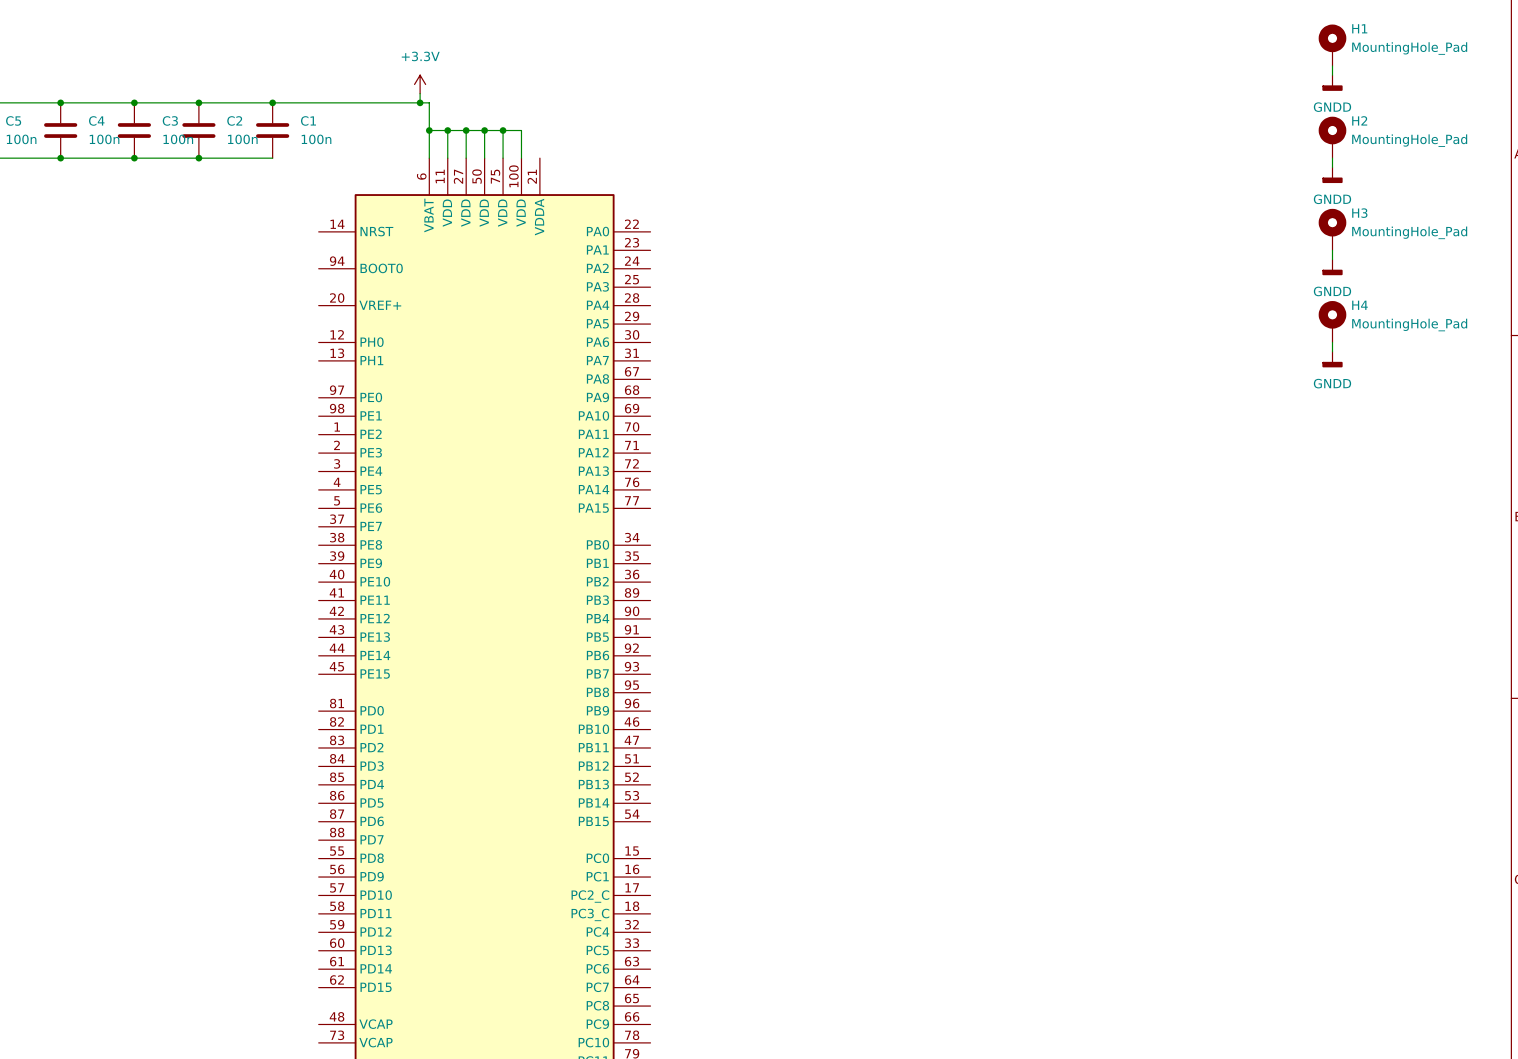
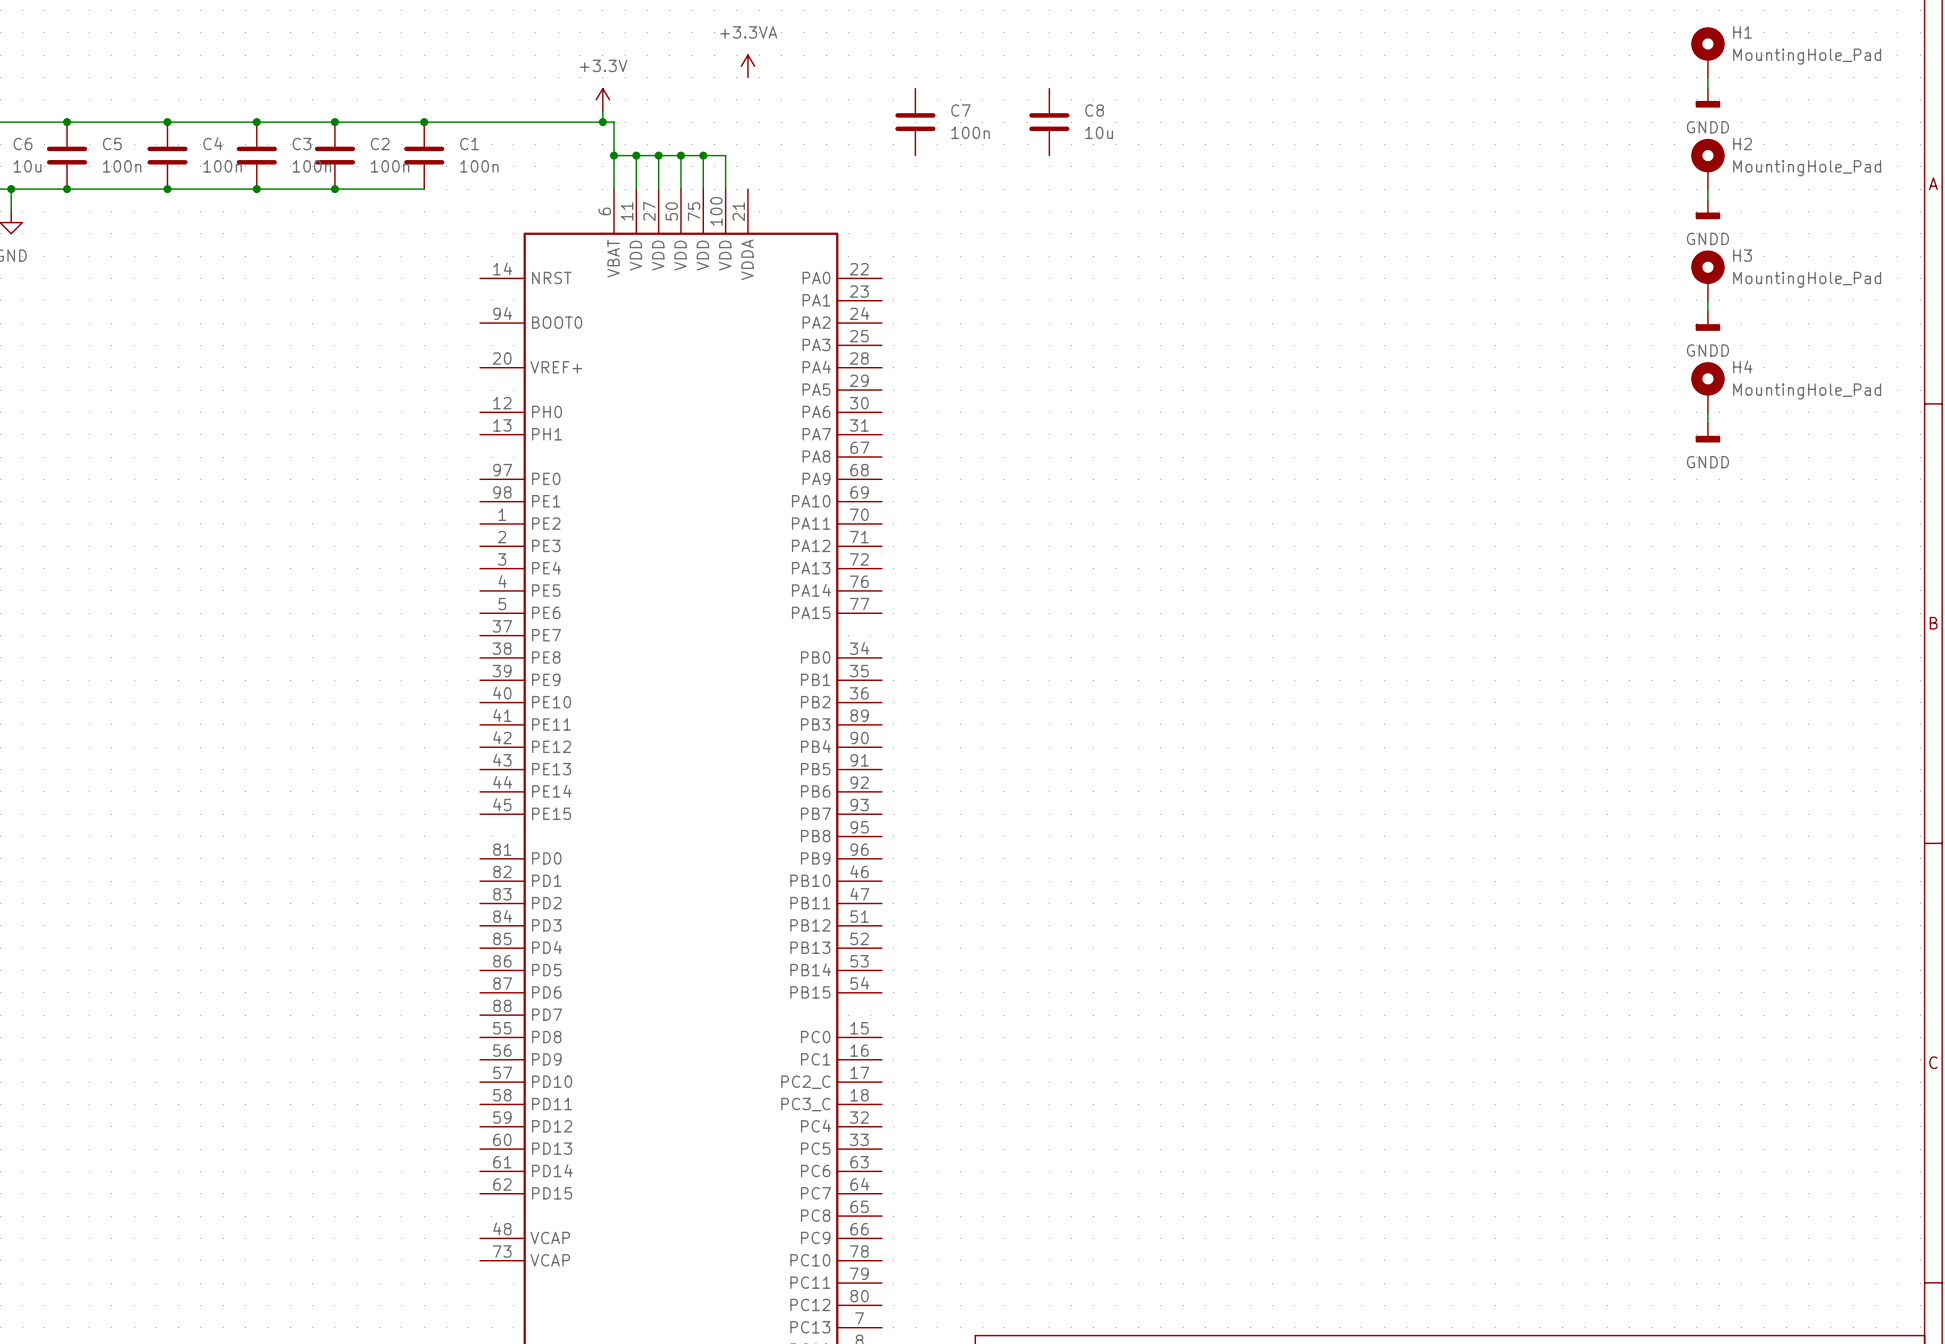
power symbol: none -> +3.3VA (747, 66)
C7: none -> 100n (915, 122)
C8: none -> 10u (1049, 122)

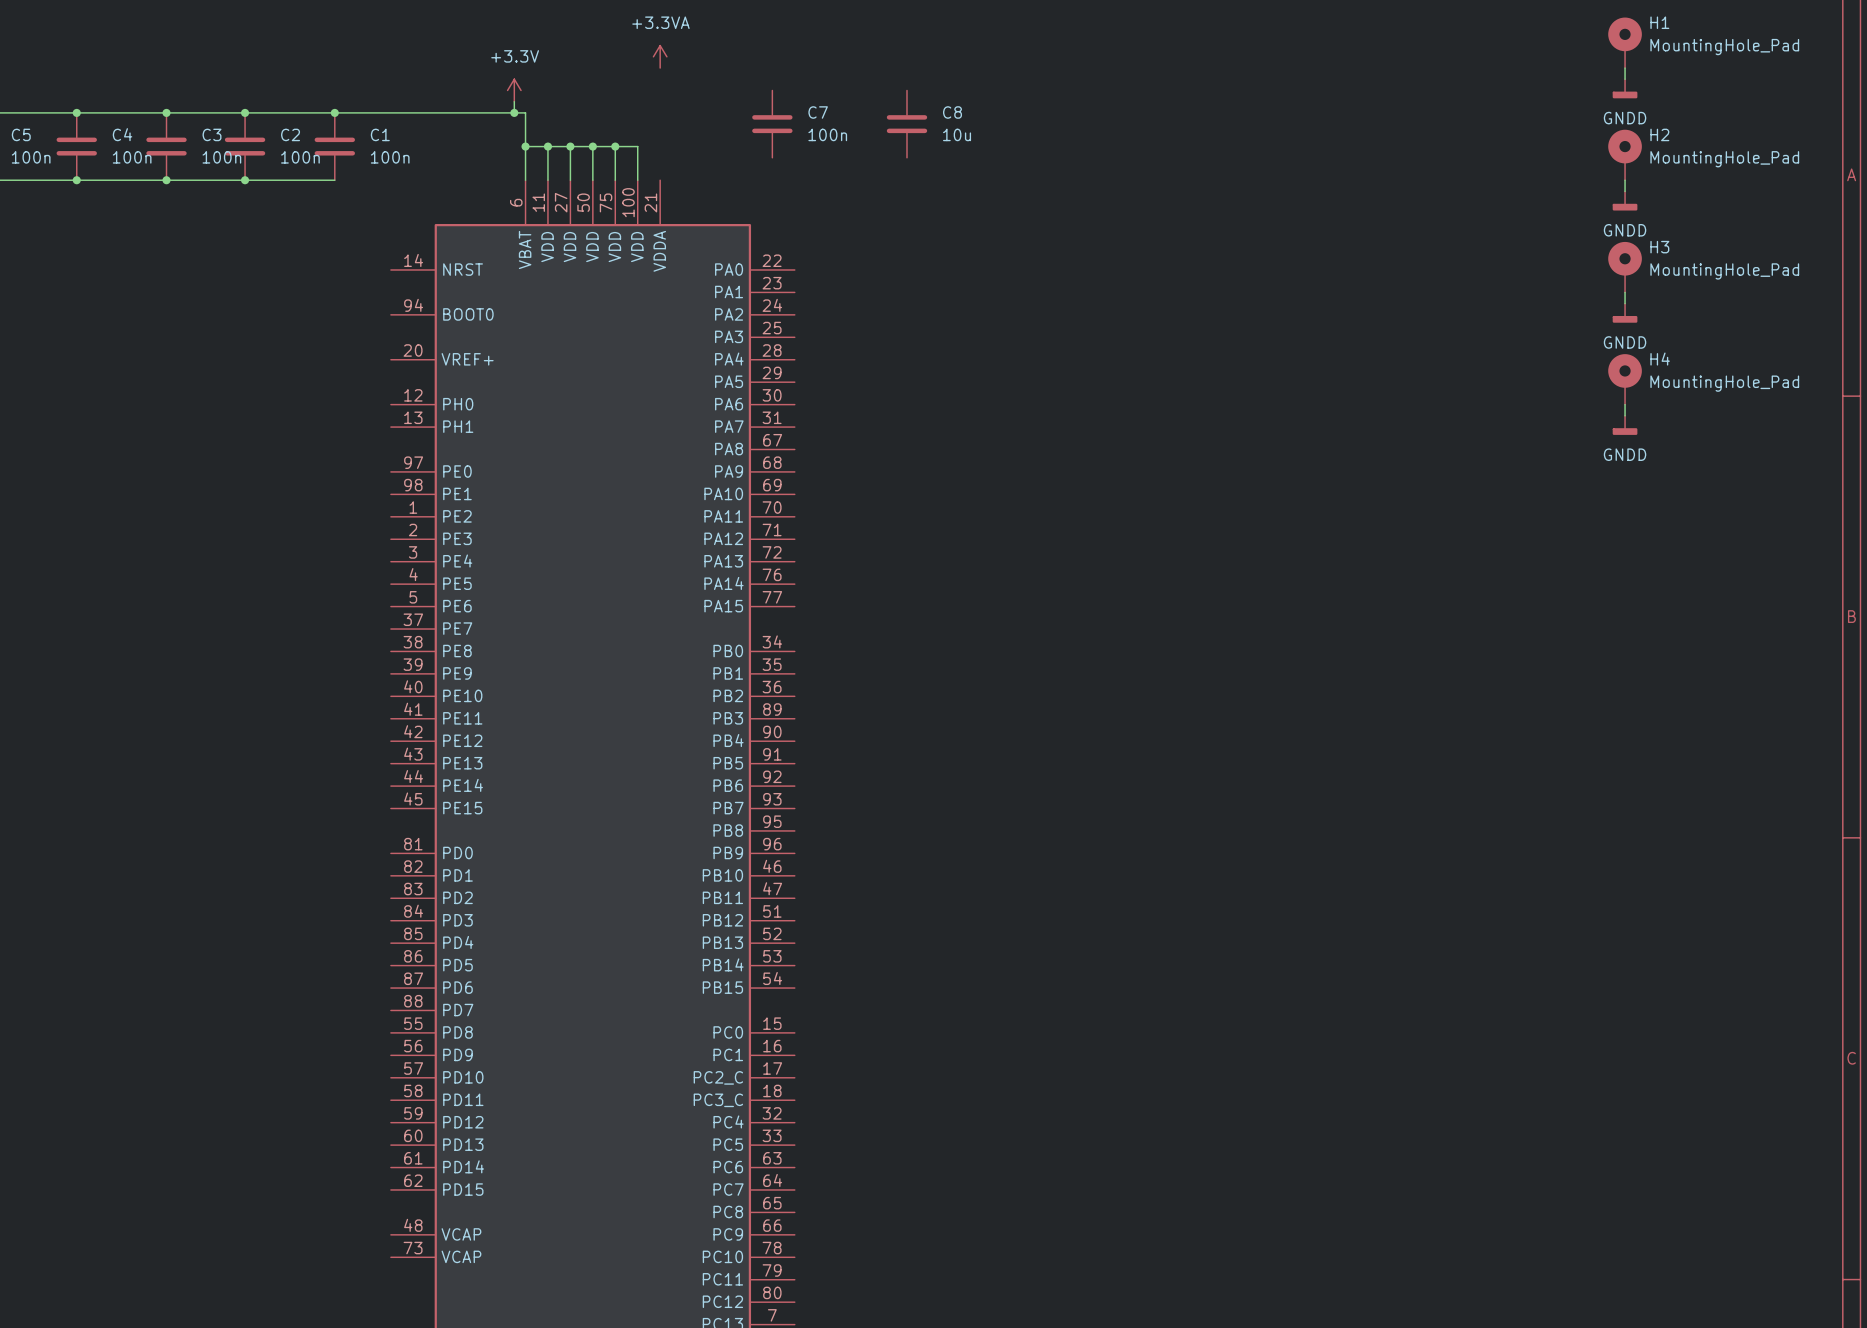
C7 position: (915, 122) -> (772, 124)
C8 position: (1049, 122) -> (906, 124)

